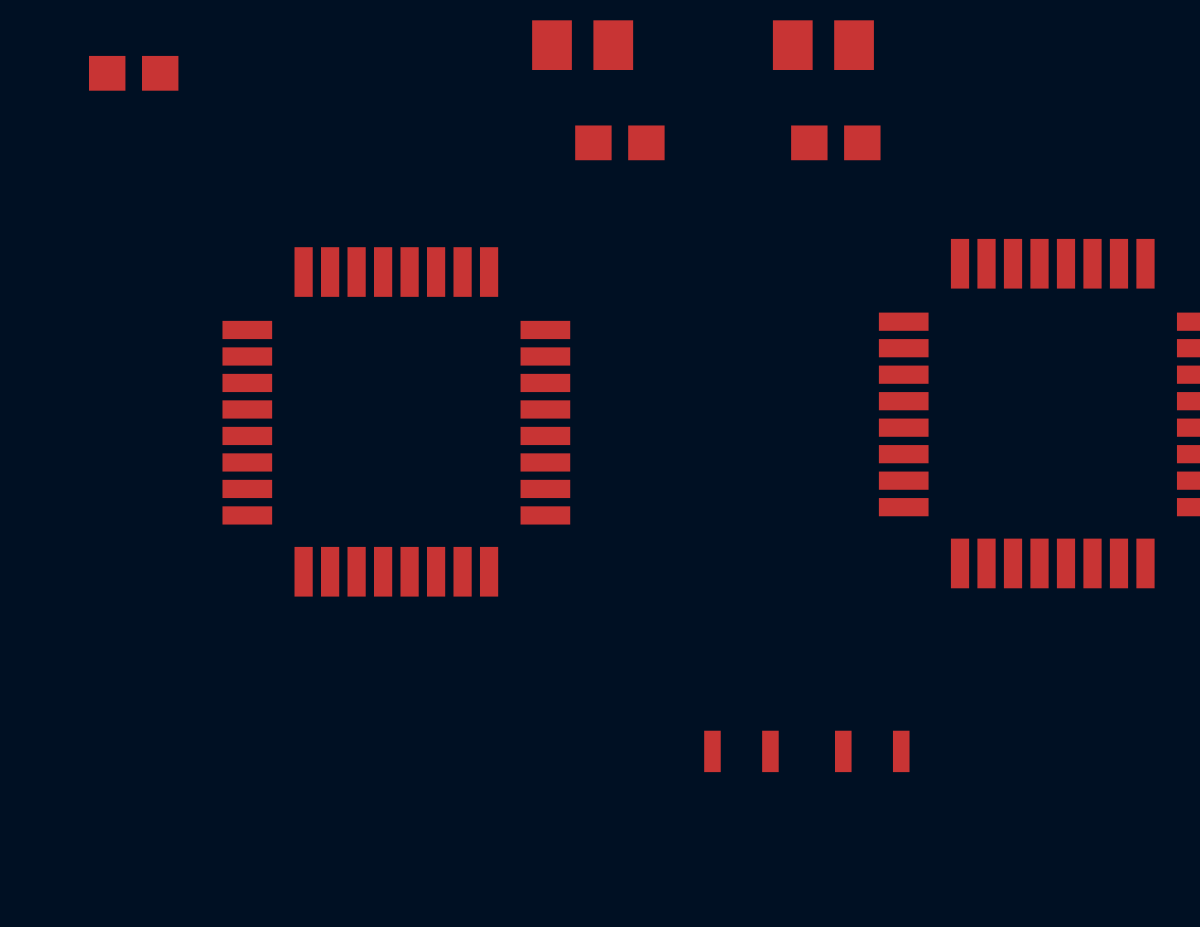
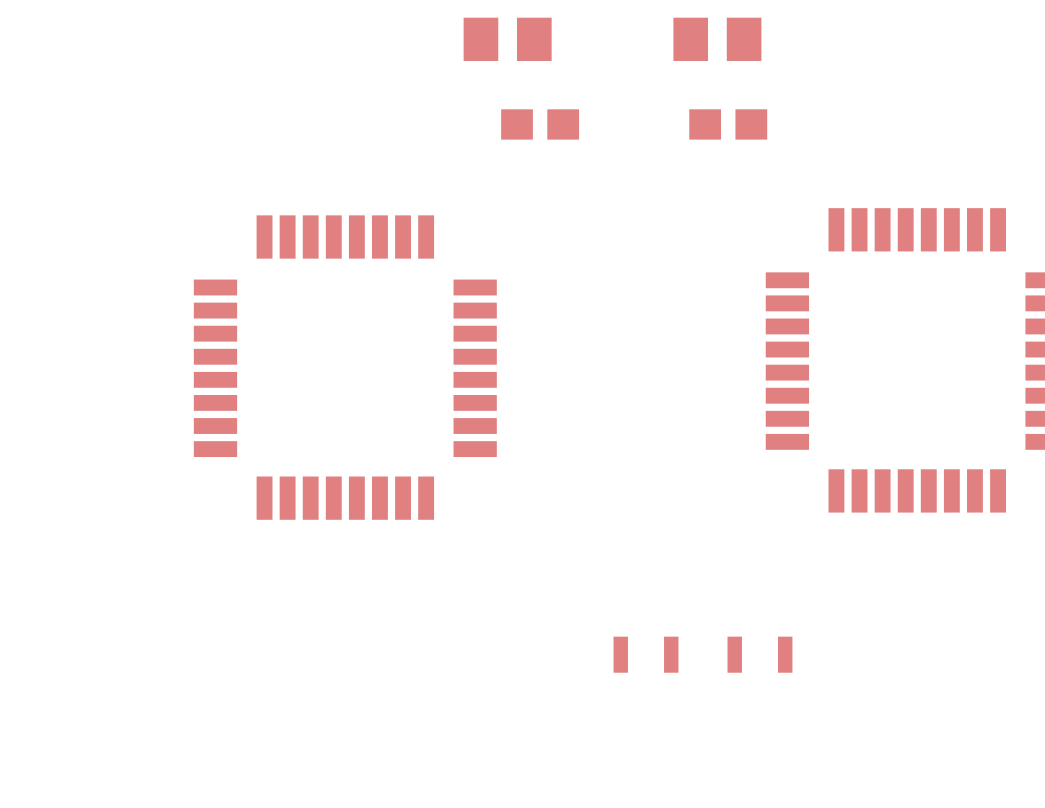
part: (133, 73) -> none

